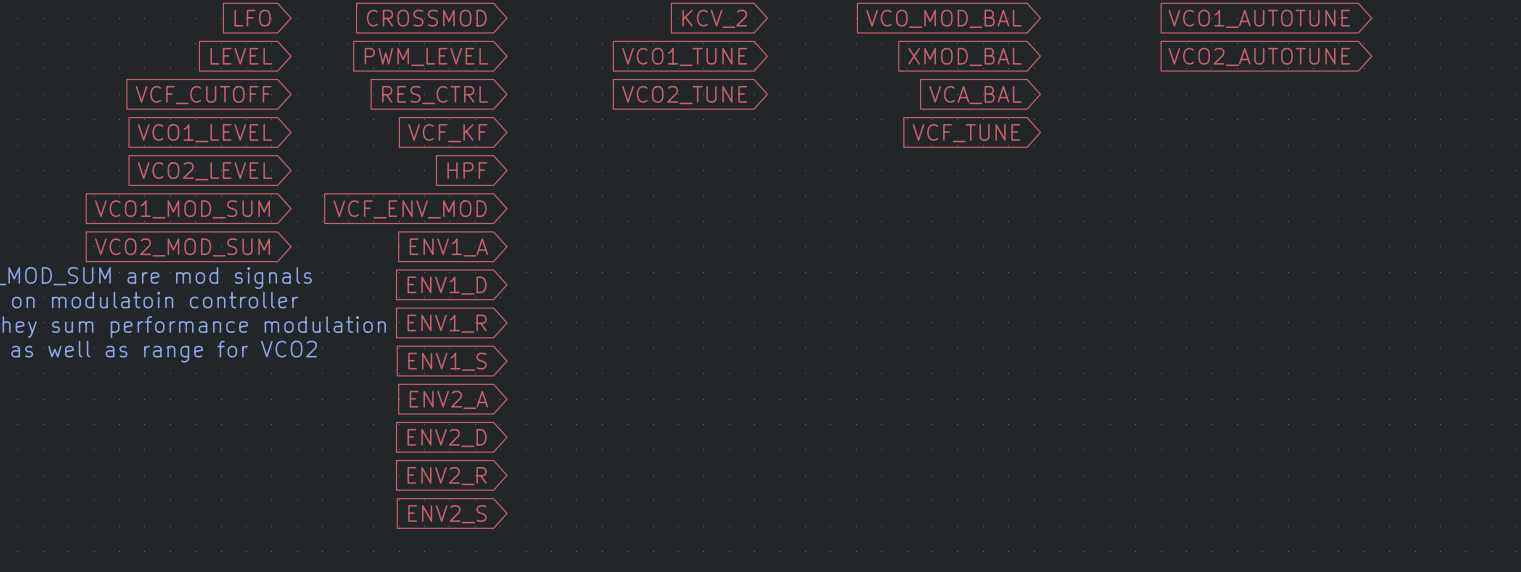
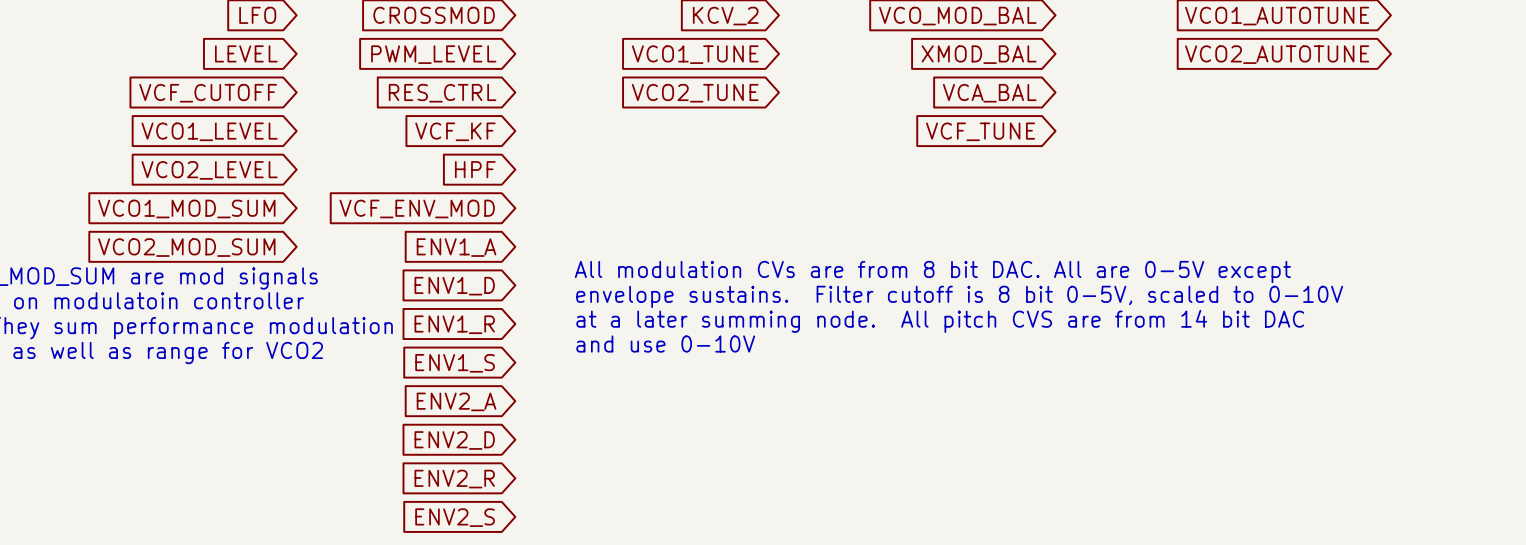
text: none -> All modulation CVs are from 8 bit DAC. All are 0-5V except (932, 272)
text: none -> envelope sustains. Filter cutoff is 8 bit 0-5V, scaled to 0-10V (959, 296)
text: none -> at a later summing node. All pitch CVS are from 14 bit DAC (940, 321)
text: none -> and use 0-10V (665, 344)

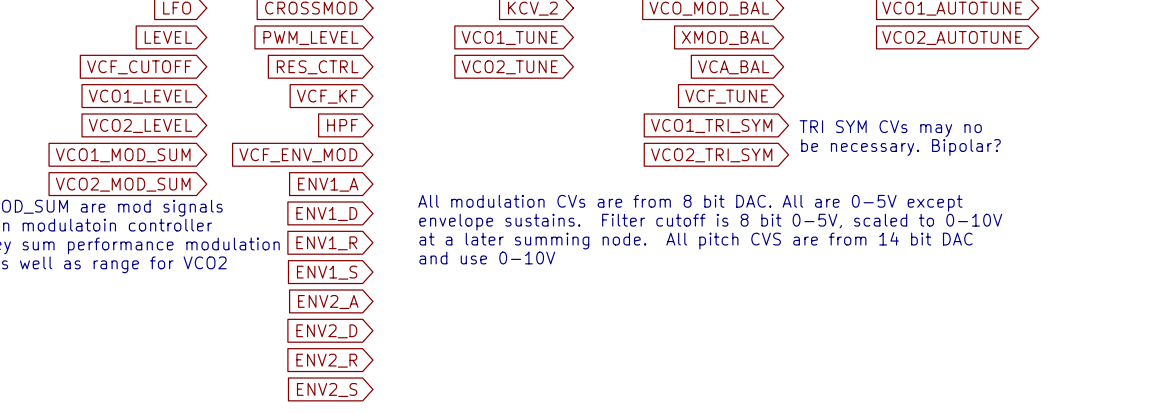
global label: none -> VCO1_TRI_SYM (711, 125)
text: none -> TRI SYM CVs may no (890, 128)
text: none -> be necessary. Bipolar? (901, 147)
global label: none -> VCO2_TRI_SYM (711, 155)

